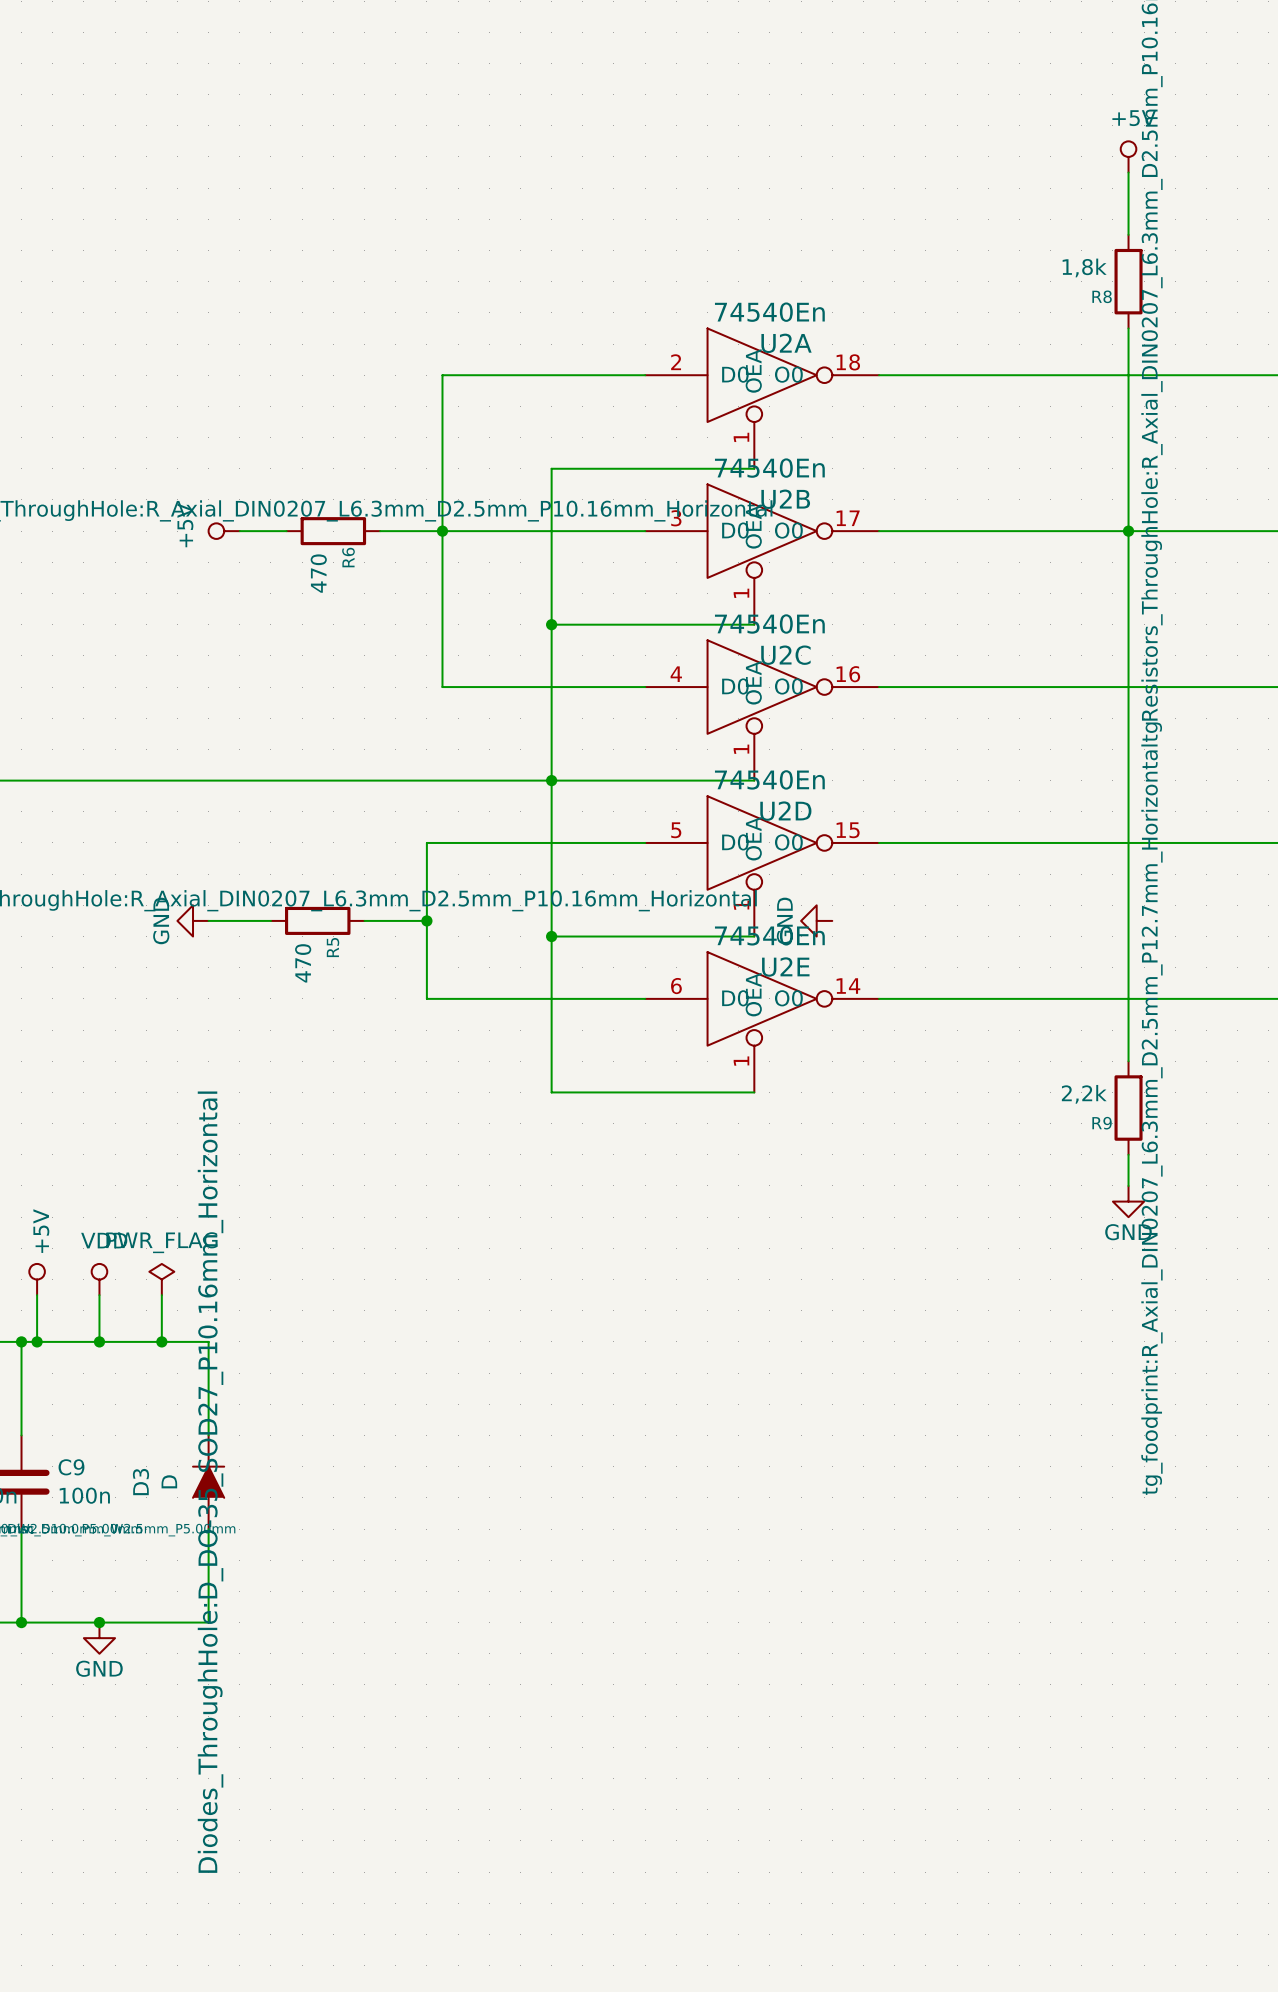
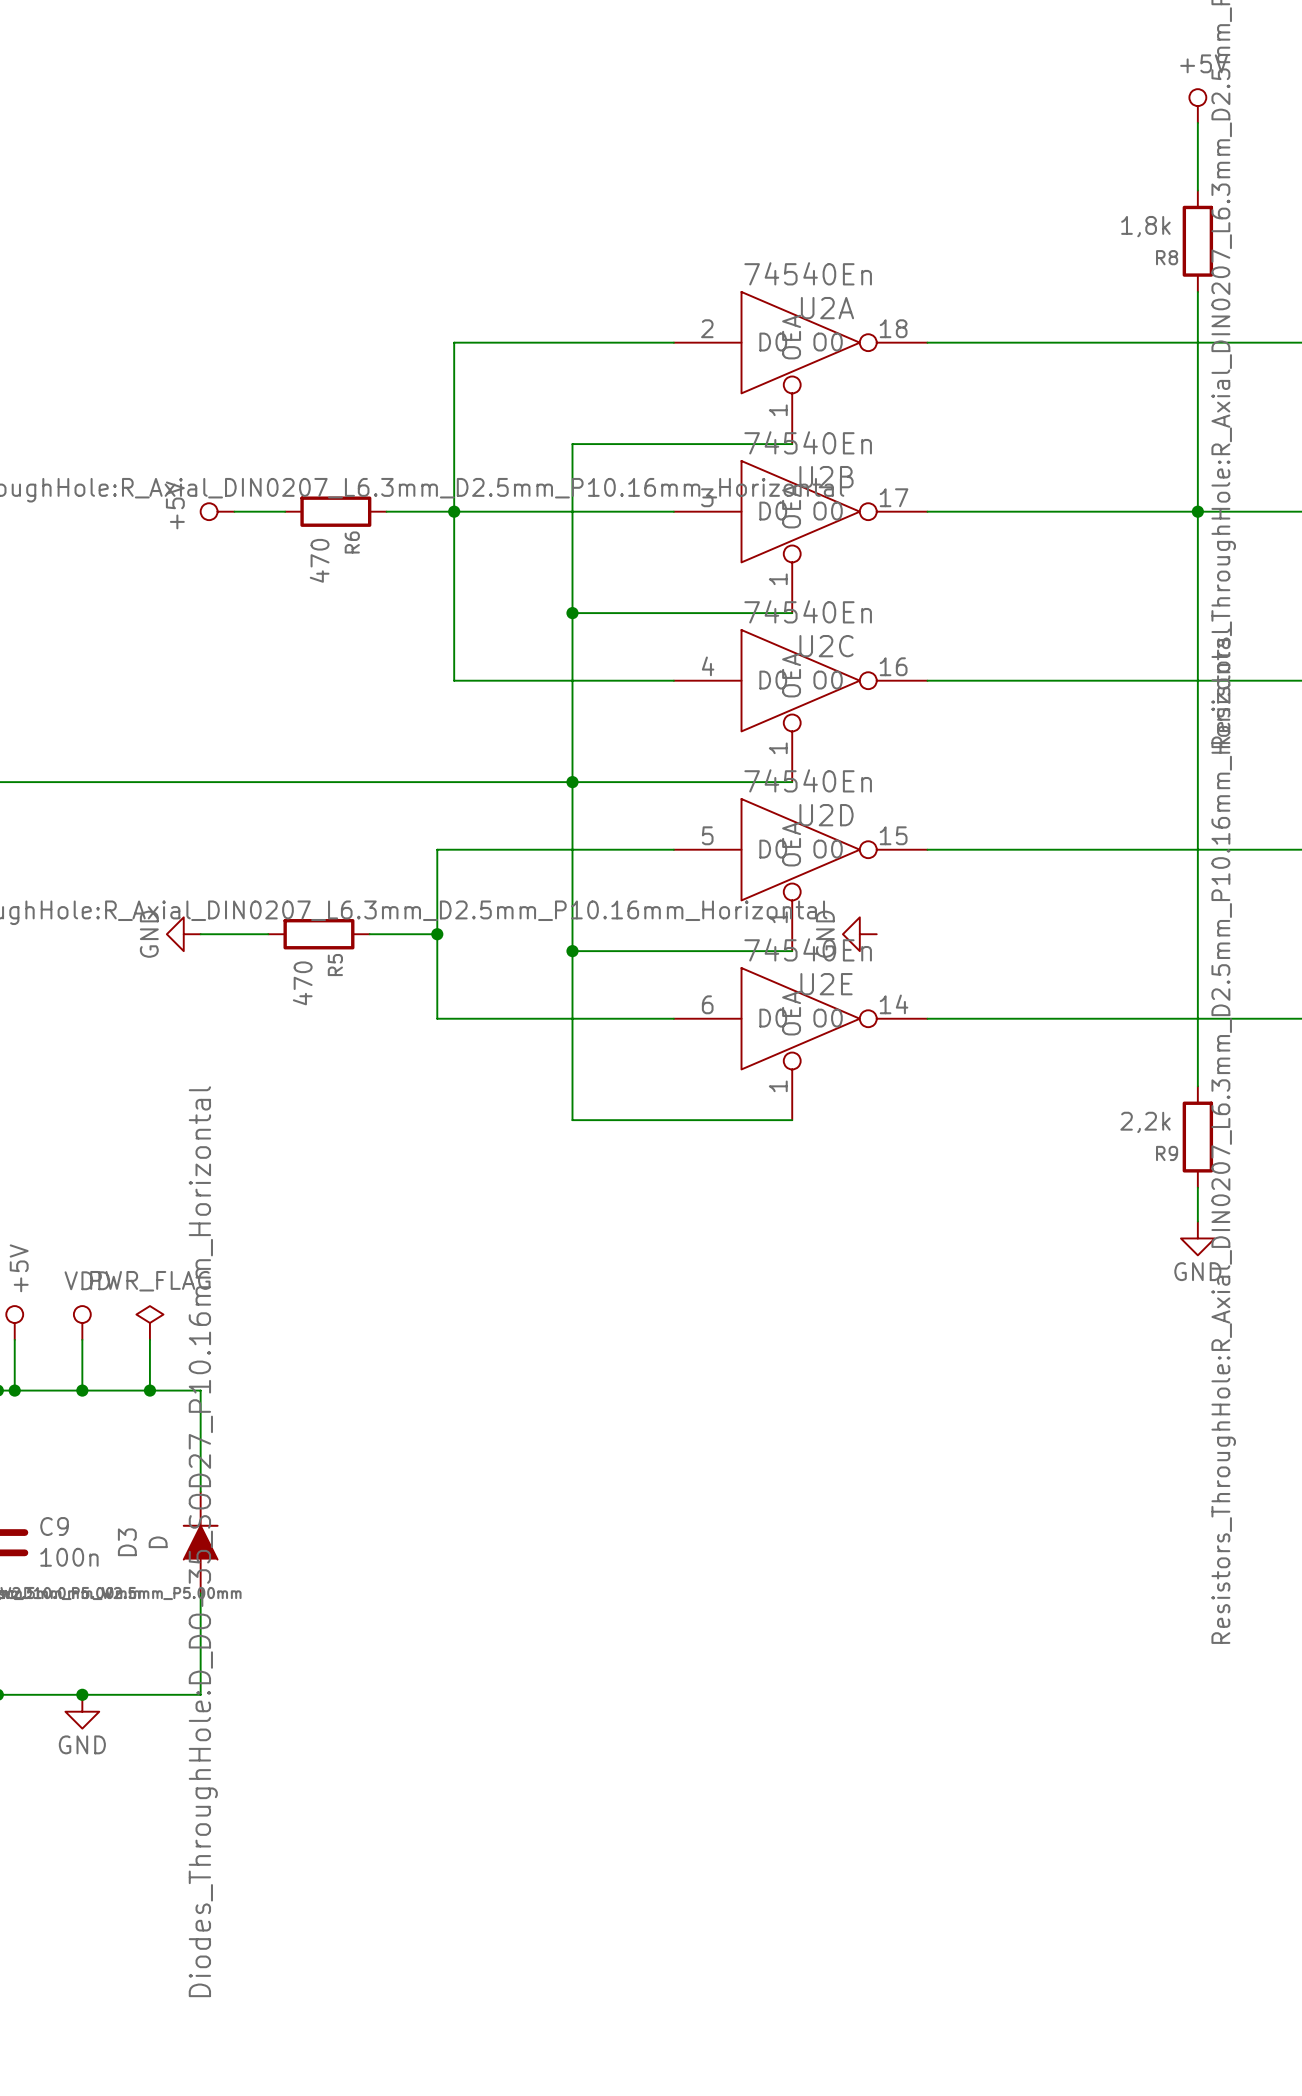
R9 text: tg_foodprint:R_Axial_DIN0207_L6.3mm_D2.5mm_P12.7mm_Horizontaltg (1151, 1108) -> Resistors_ThroughHole:R_Axial_DIN0207_L6.3mm_D2.5mm_P10.16mm_Horizontal (1223, 1136)

